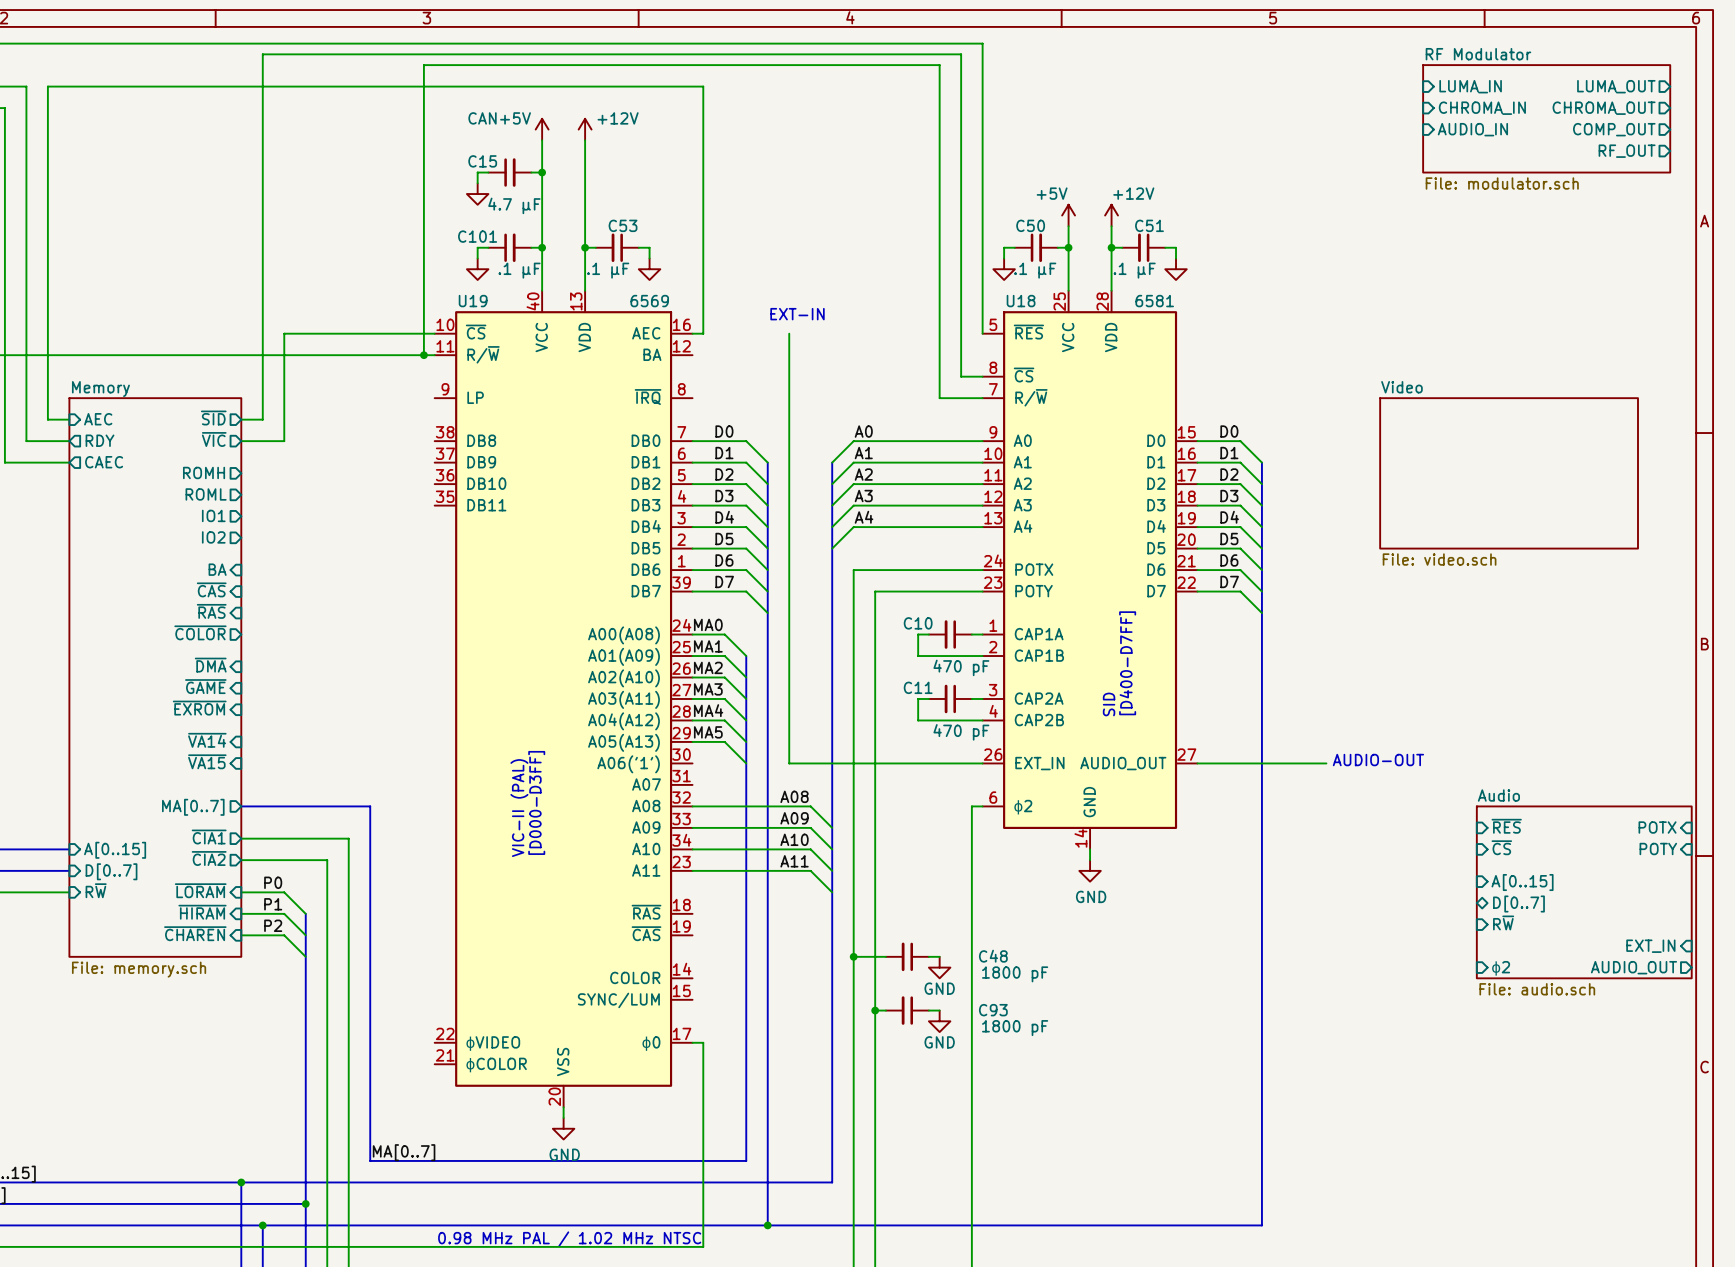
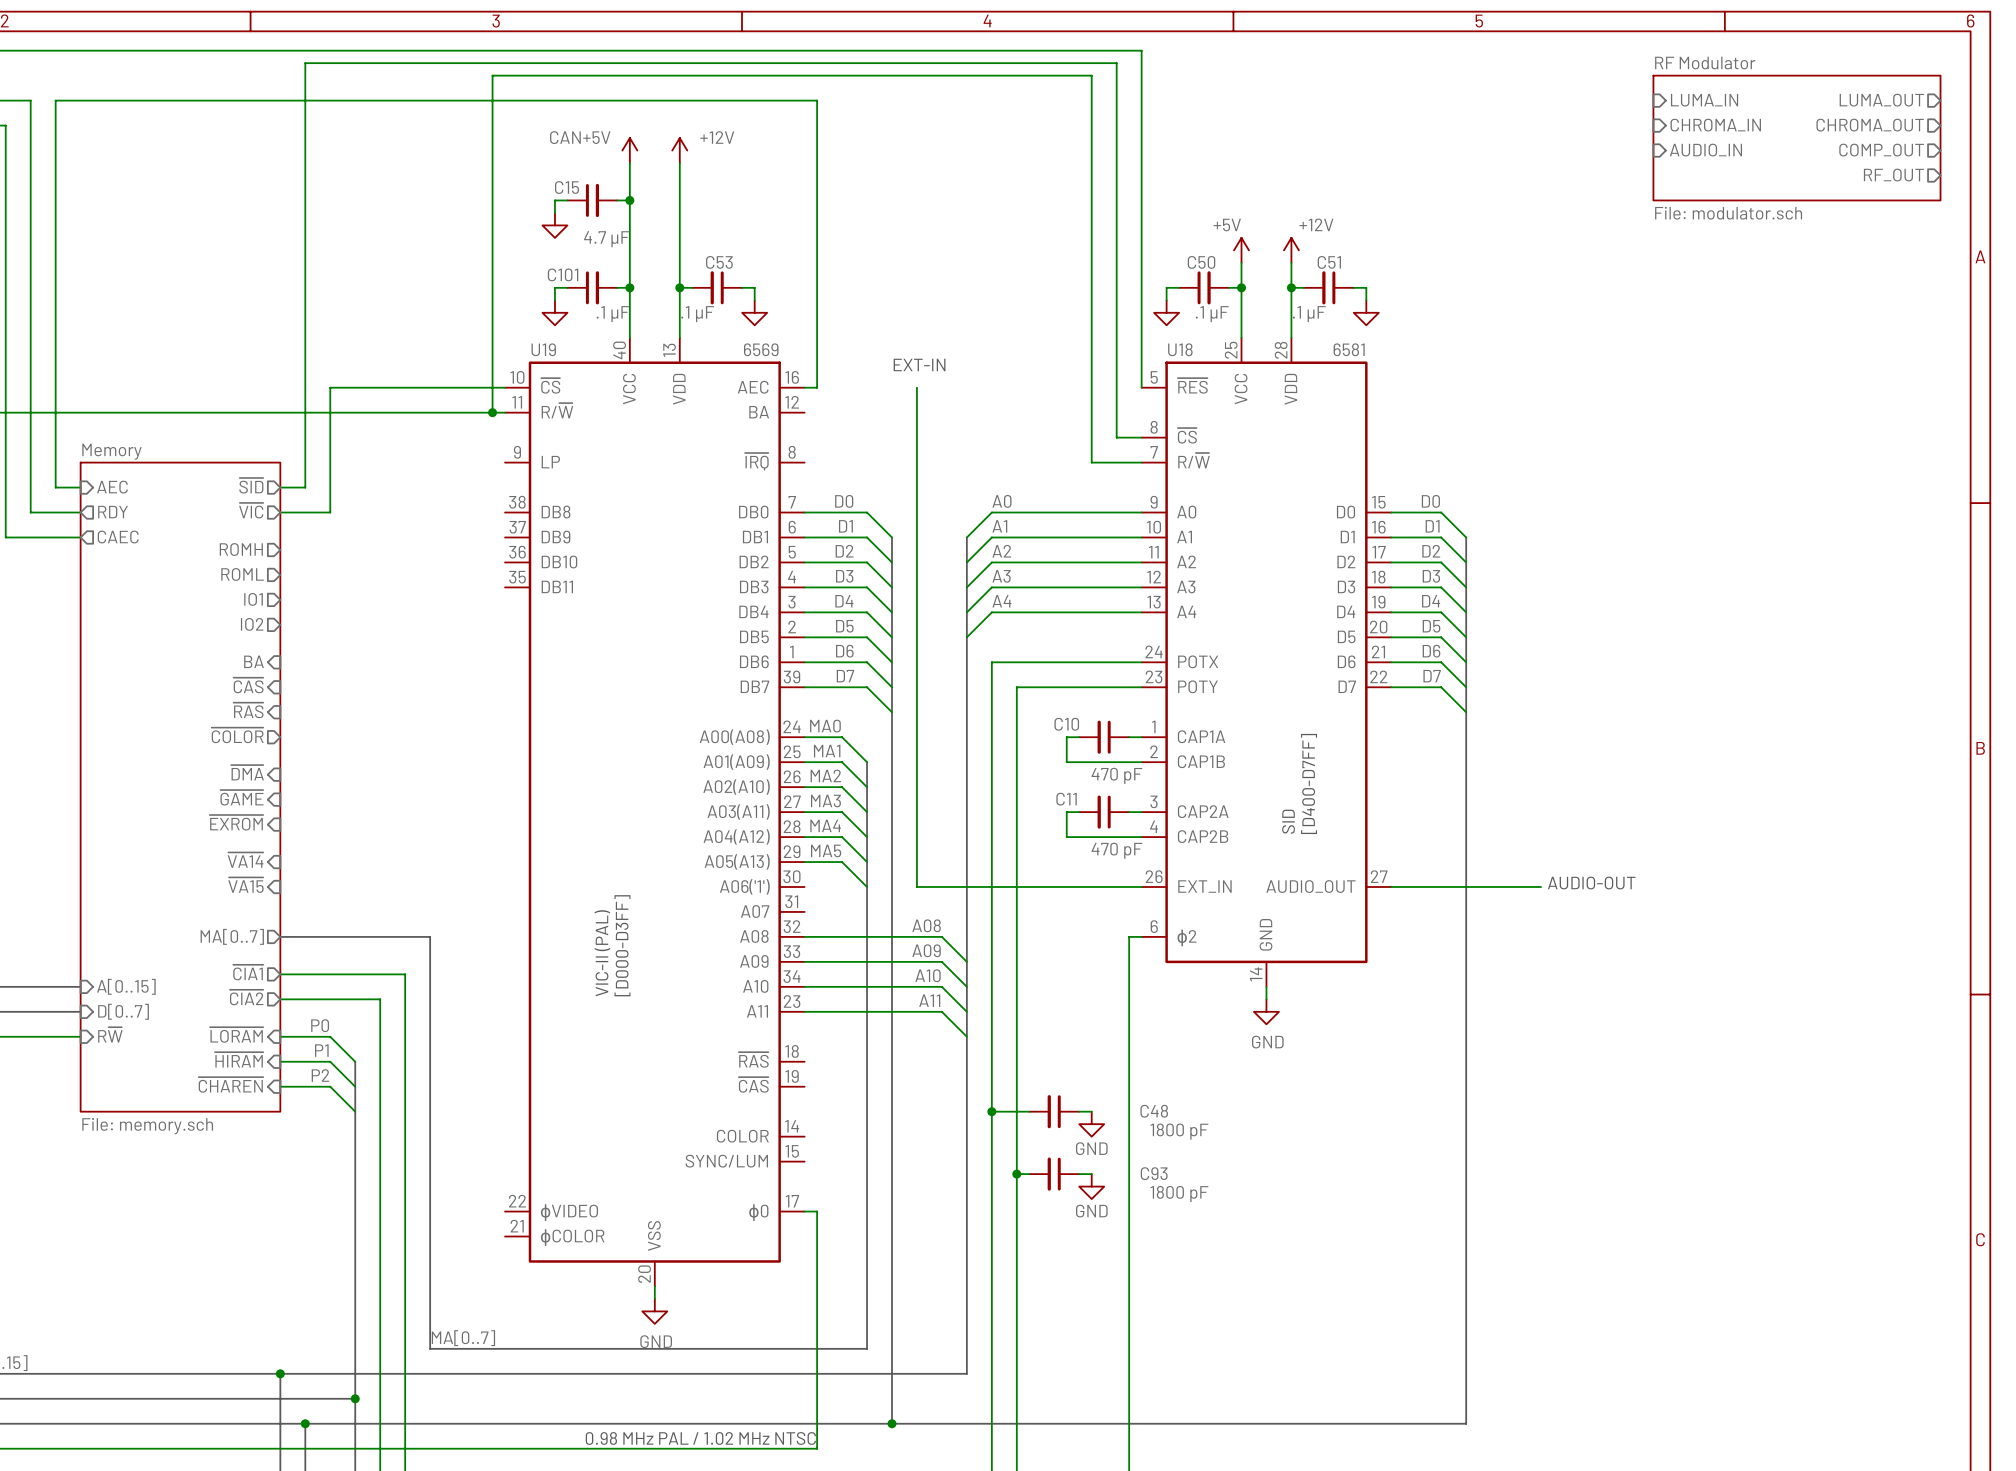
sheet Video: File: video.sch (1509, 473) -> none
sheet pin: ~{RES} (1506, 826) -> none
sheet pin: POTX (1657, 827) -> none
sheet pin: ~{CS} (1501, 847) -> none
sheet pin: POTY (1658, 849) -> none
sheet pin: A[0..15] (1522, 882) -> none
sheet Audio: File: audio.sch (1584, 892) -> none
sheet pin: D[0..7] (1518, 904) -> none
sheet pin: R~{W} (1503, 922) -> none
sheet pin: EXT_IN (1650, 946) -> none
sheet pin: AUDIO_OUT (1633, 967) -> none
sheet pin: ϕ2 (1500, 968) -> none

